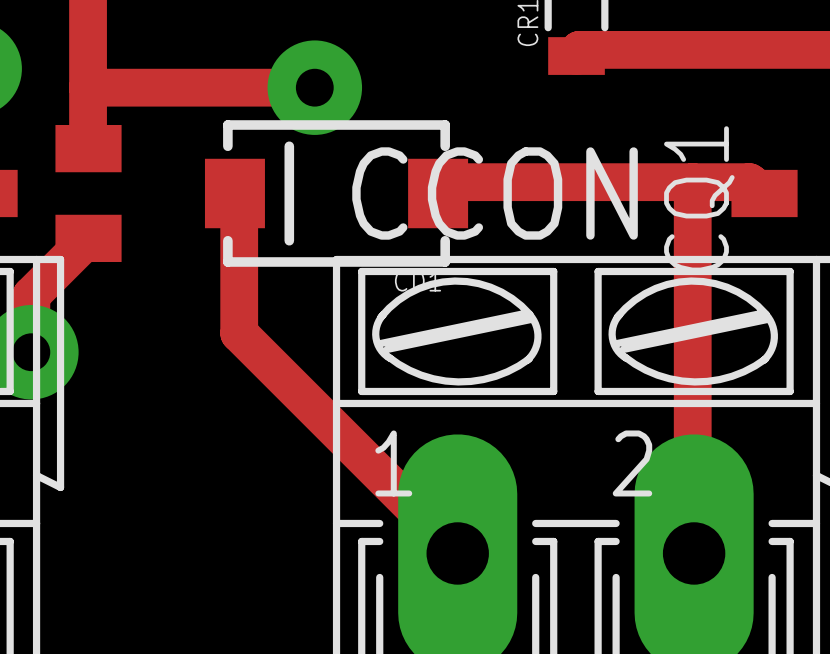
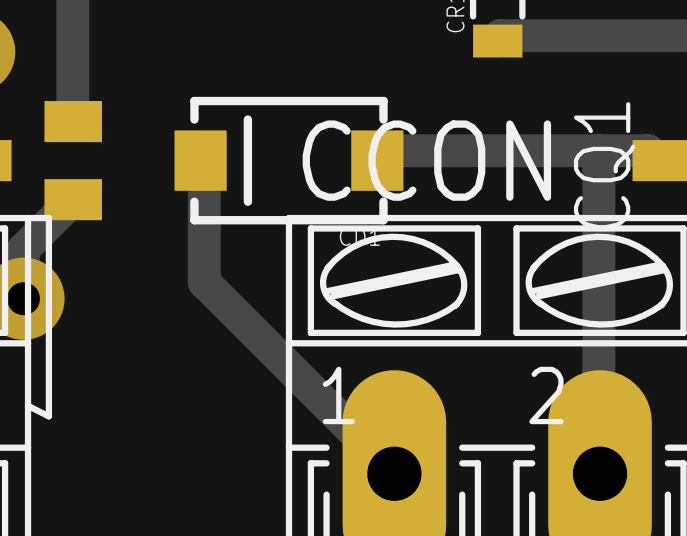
track: (88, 87) (314, 87) -> none
via: (314, 87) -> none

